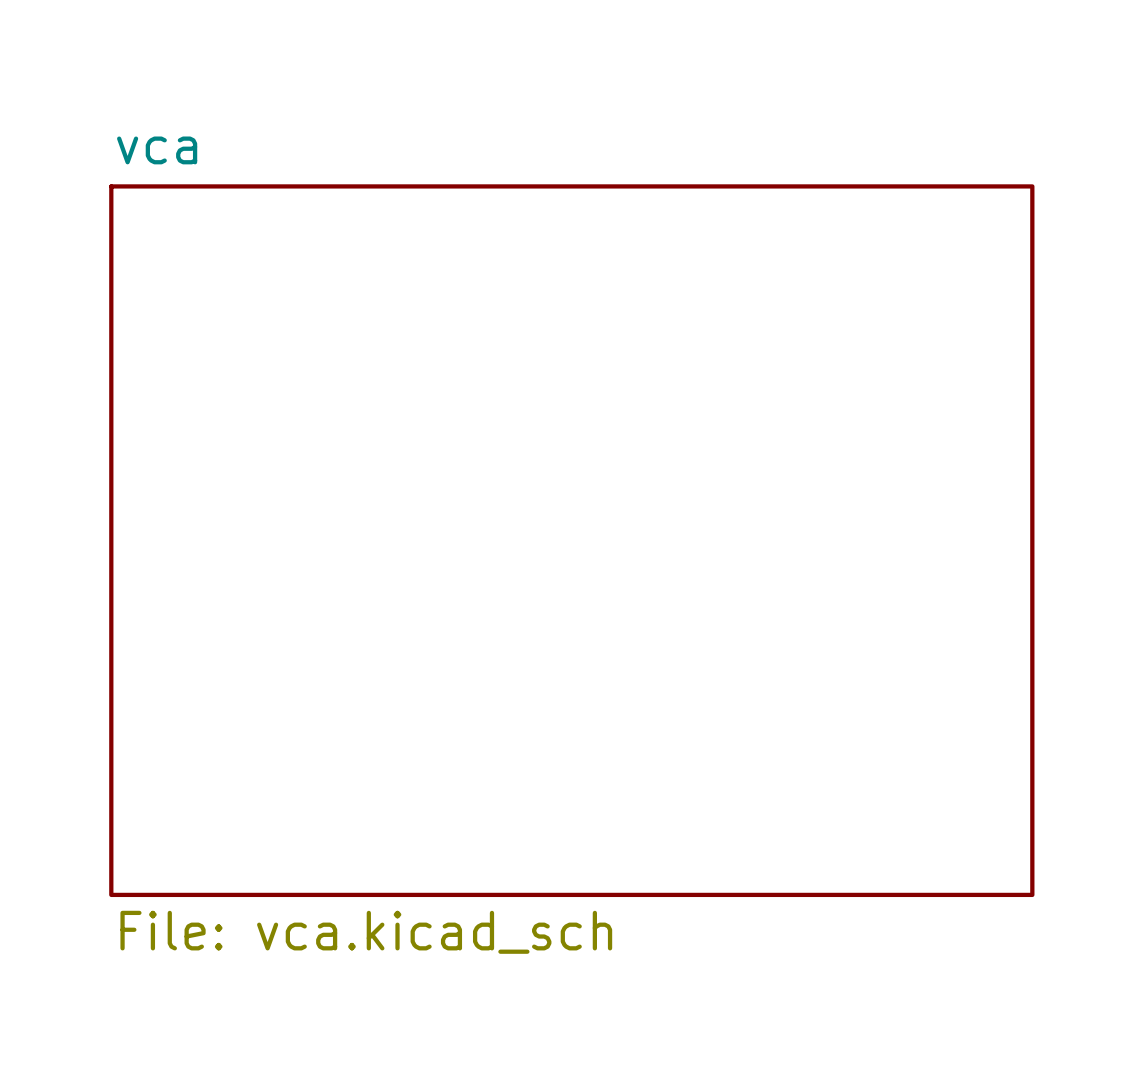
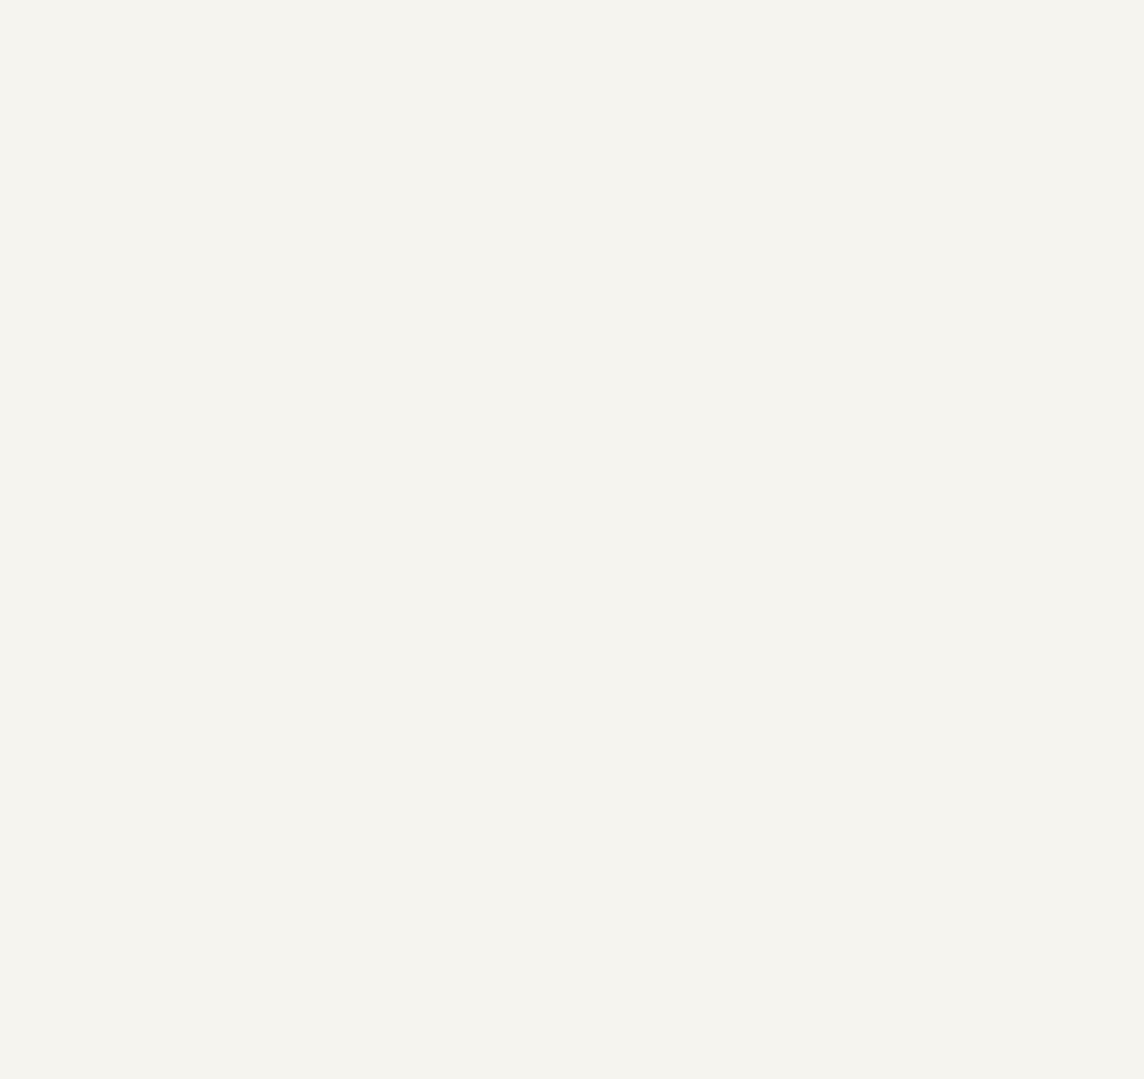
sheet vca: File: vca.kicad_sch (571, 540) -> none

